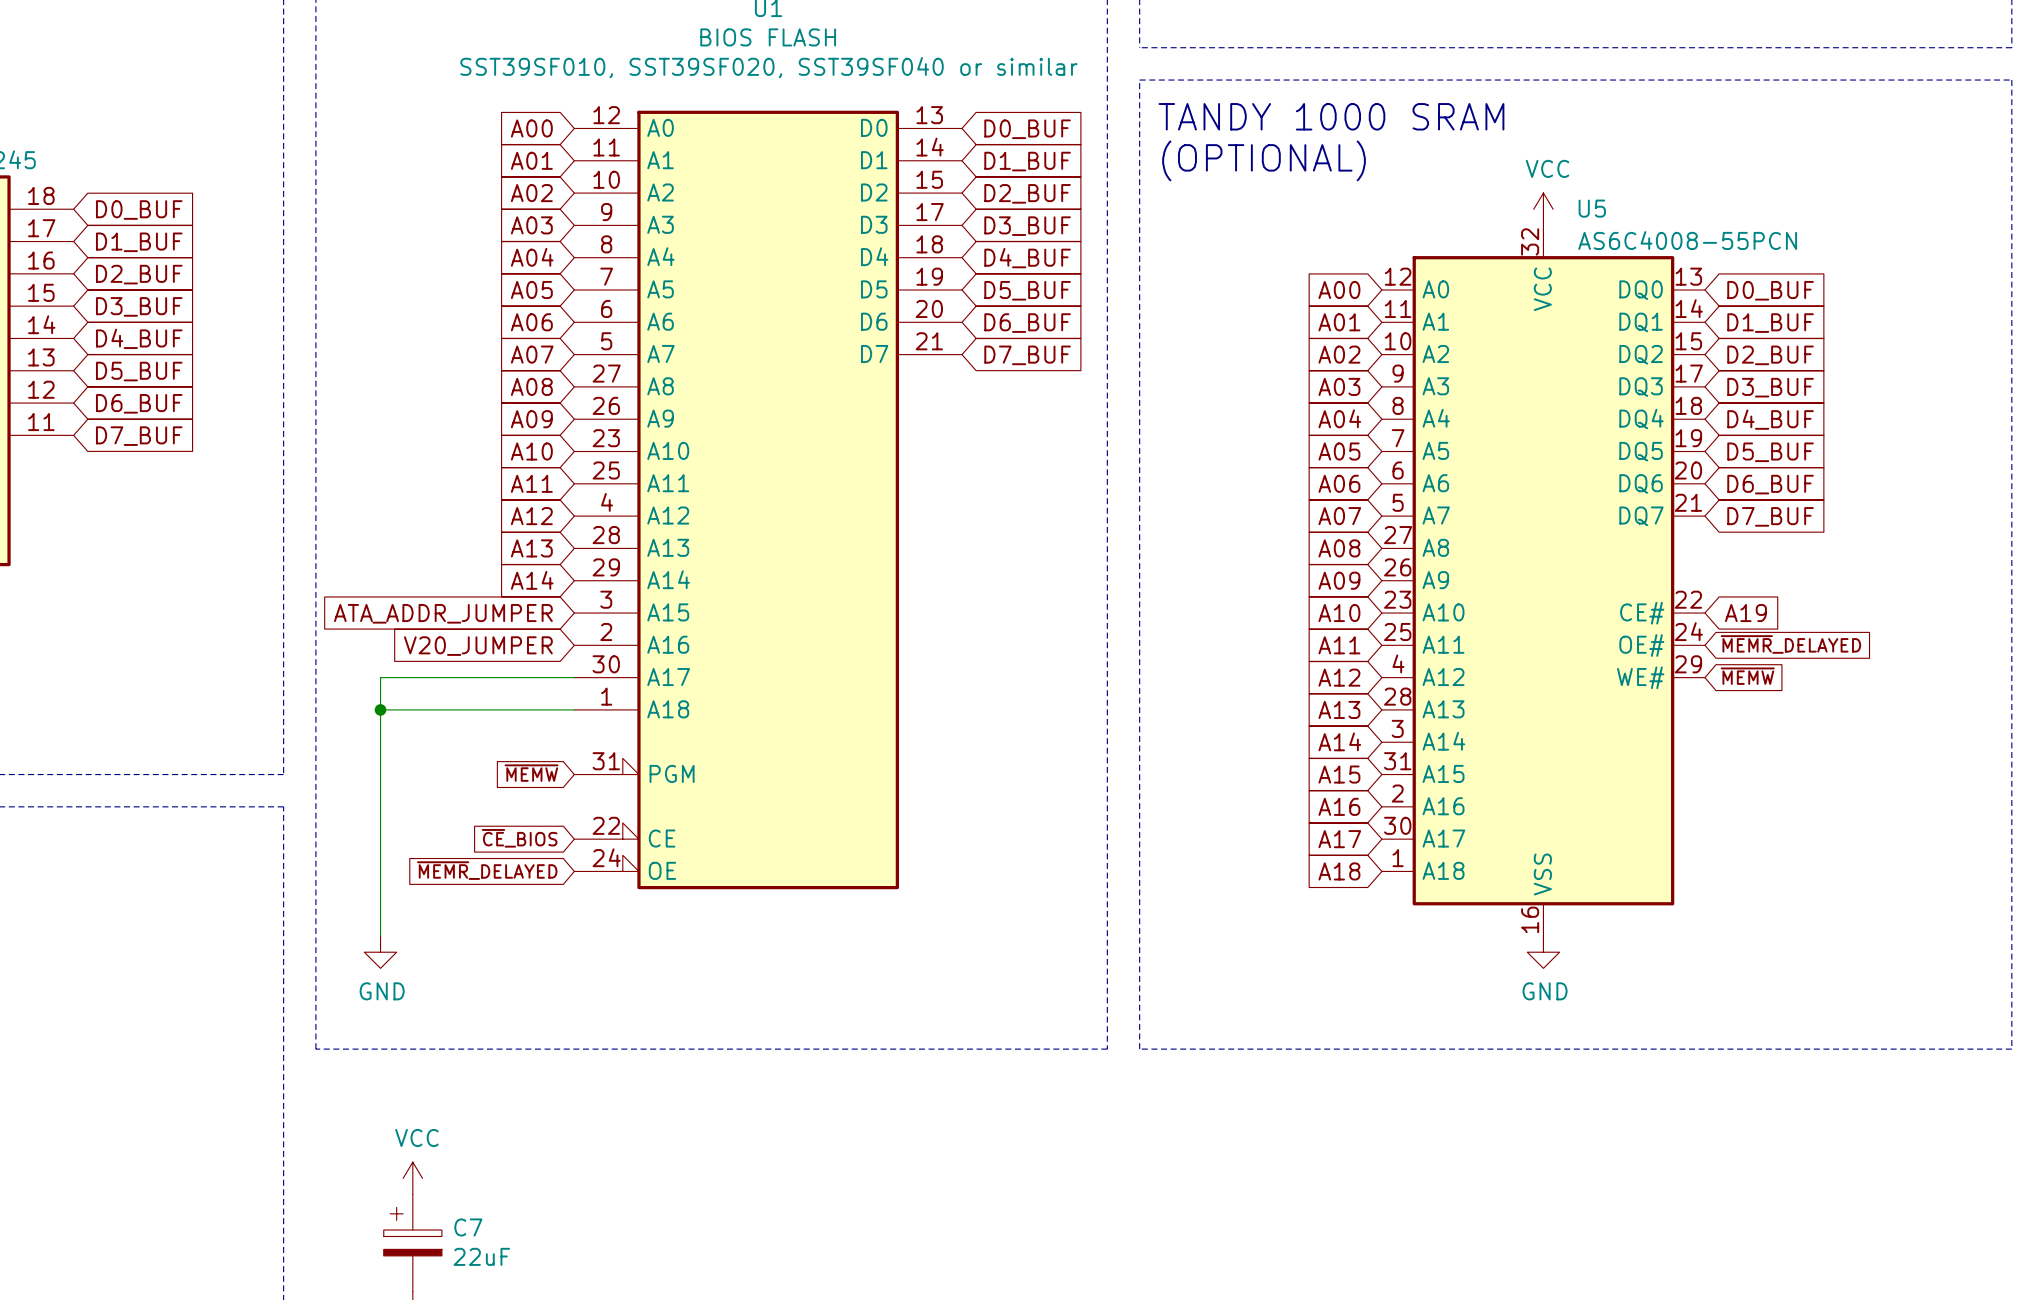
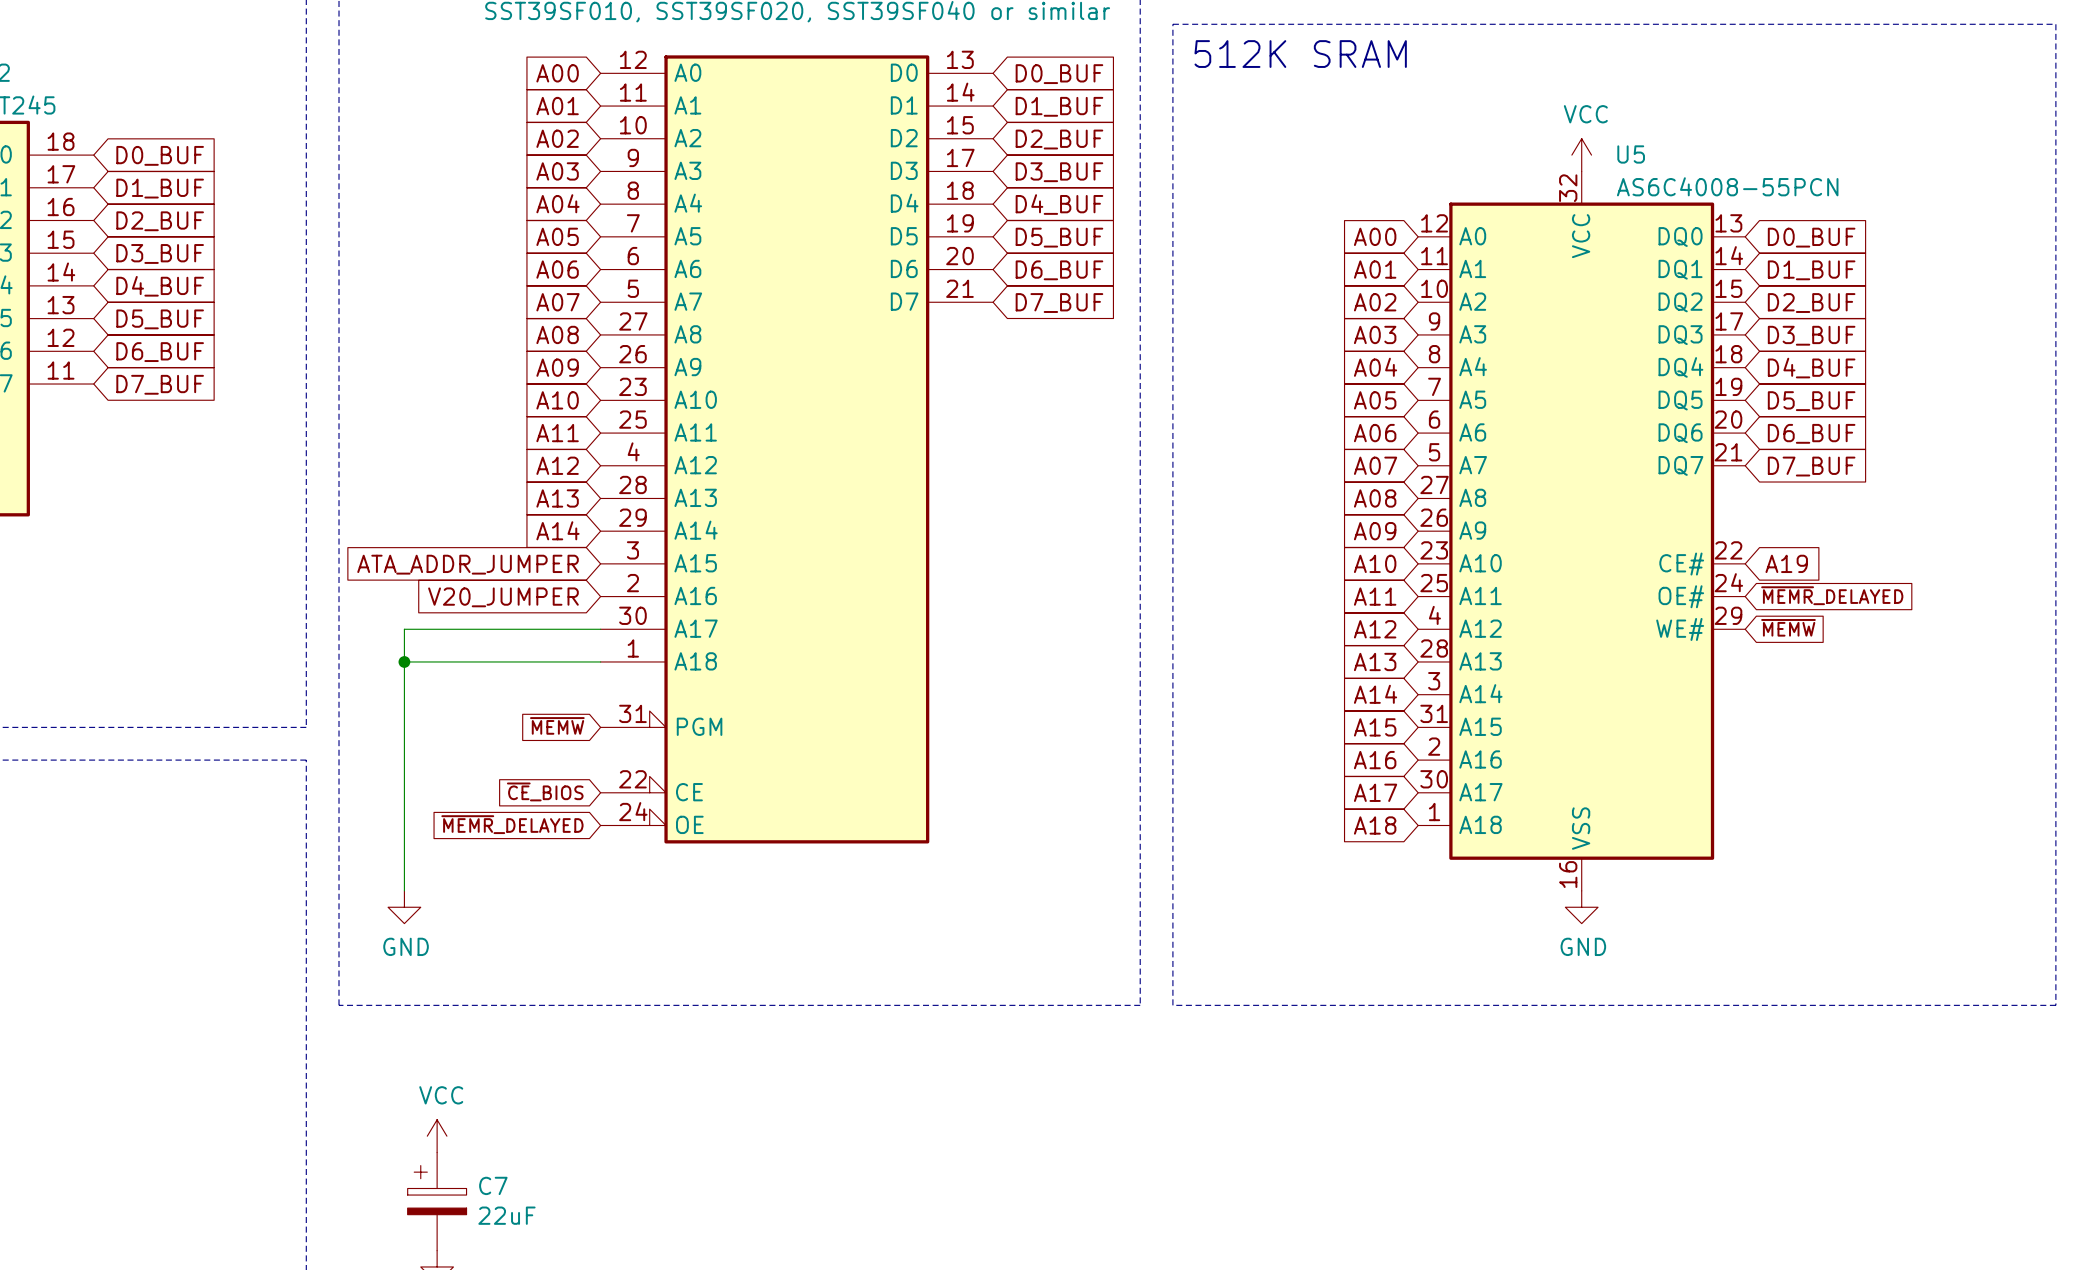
text: TANDY 1000 SRAM (1331, 116) -> 512K SRAM (1300, 54)
text: (OPTIONAL) (1264, 160) -> none

